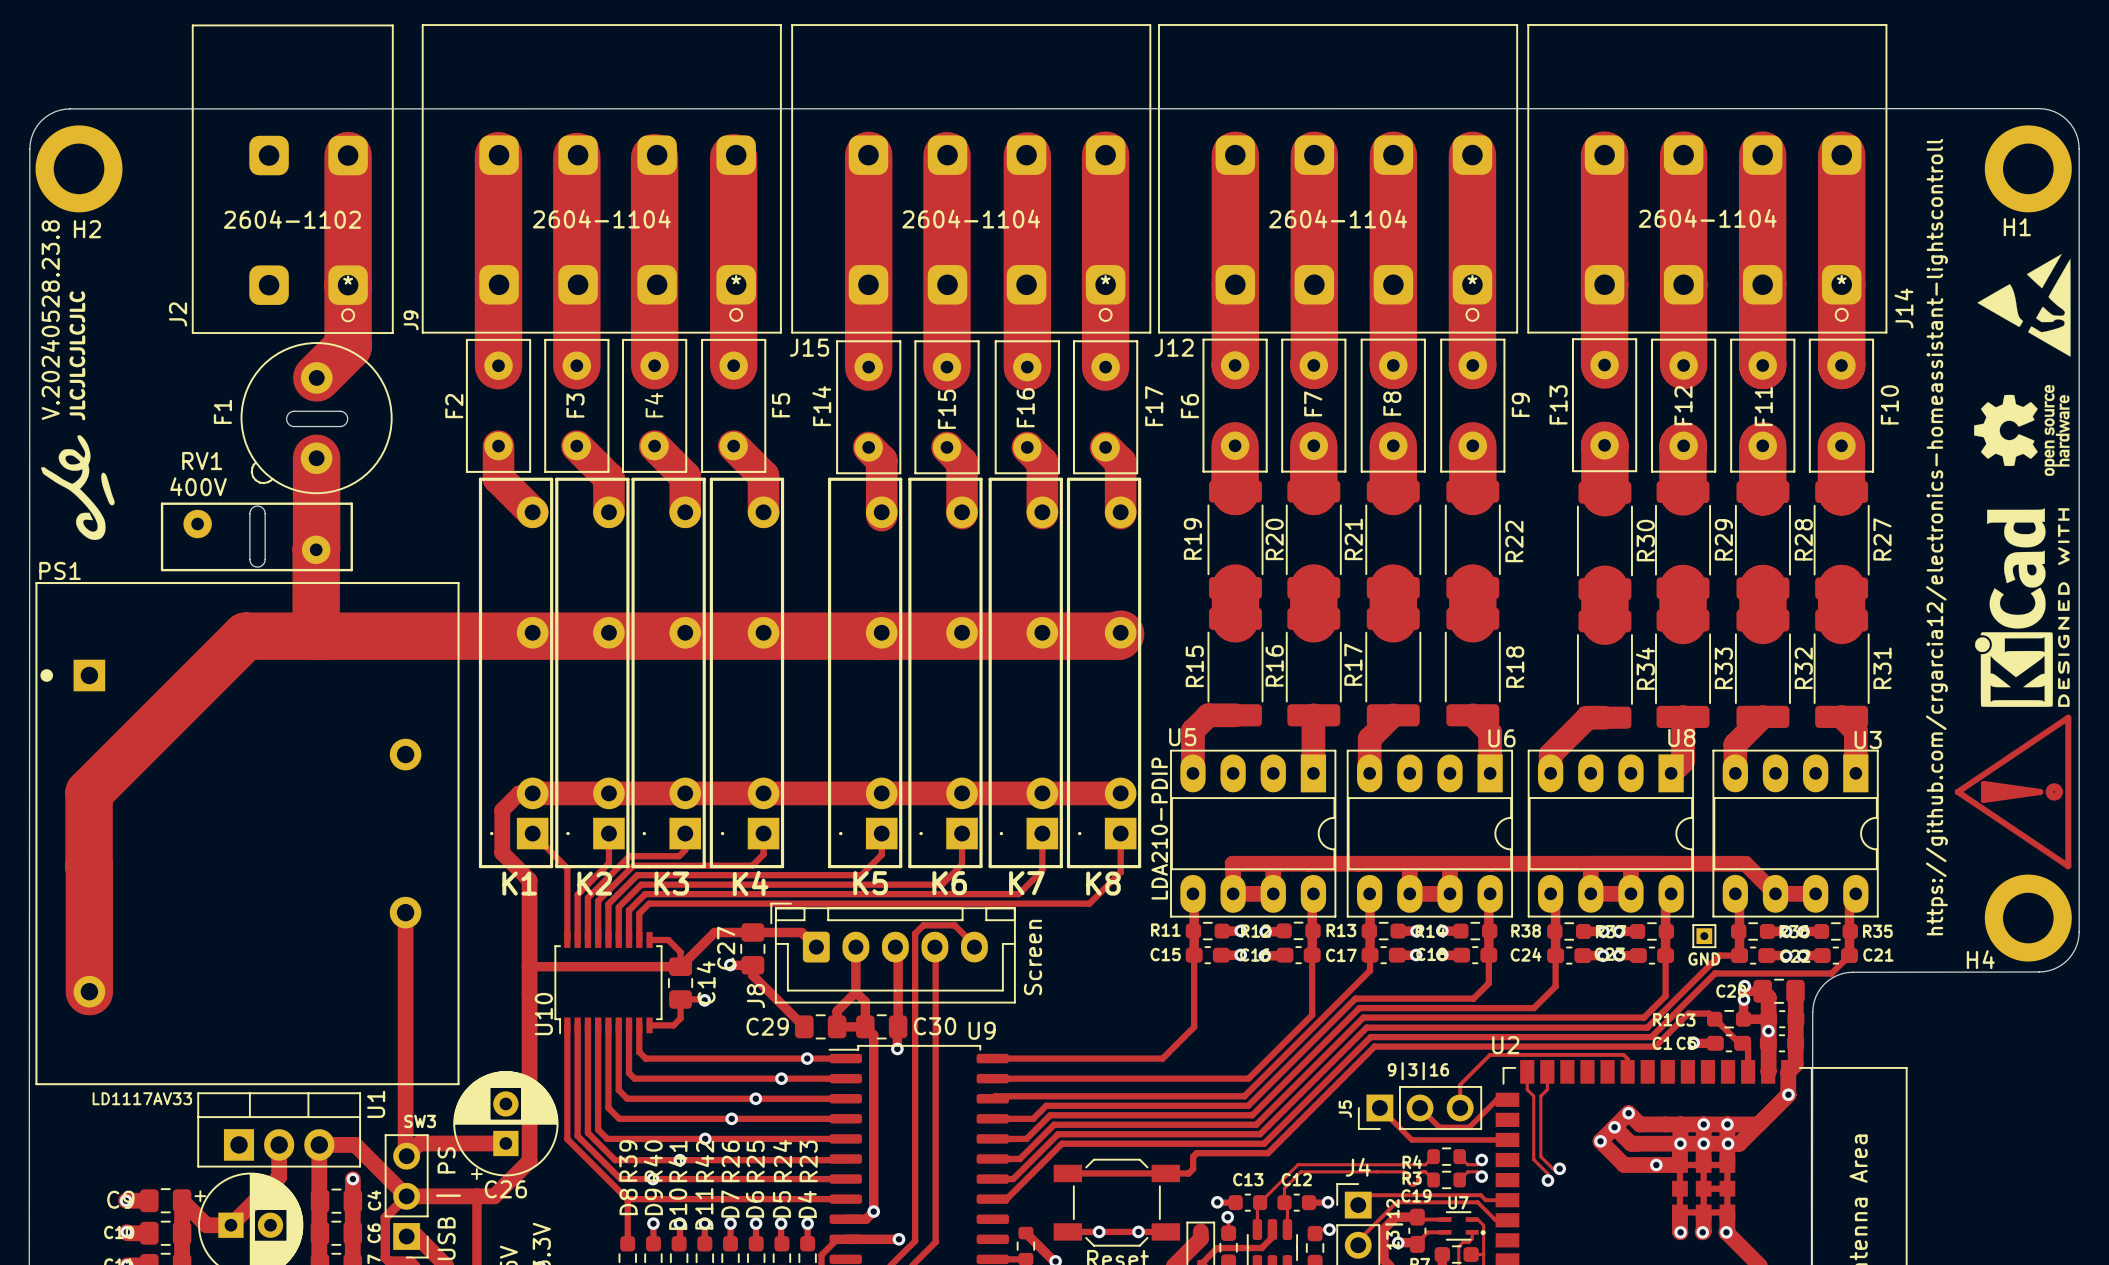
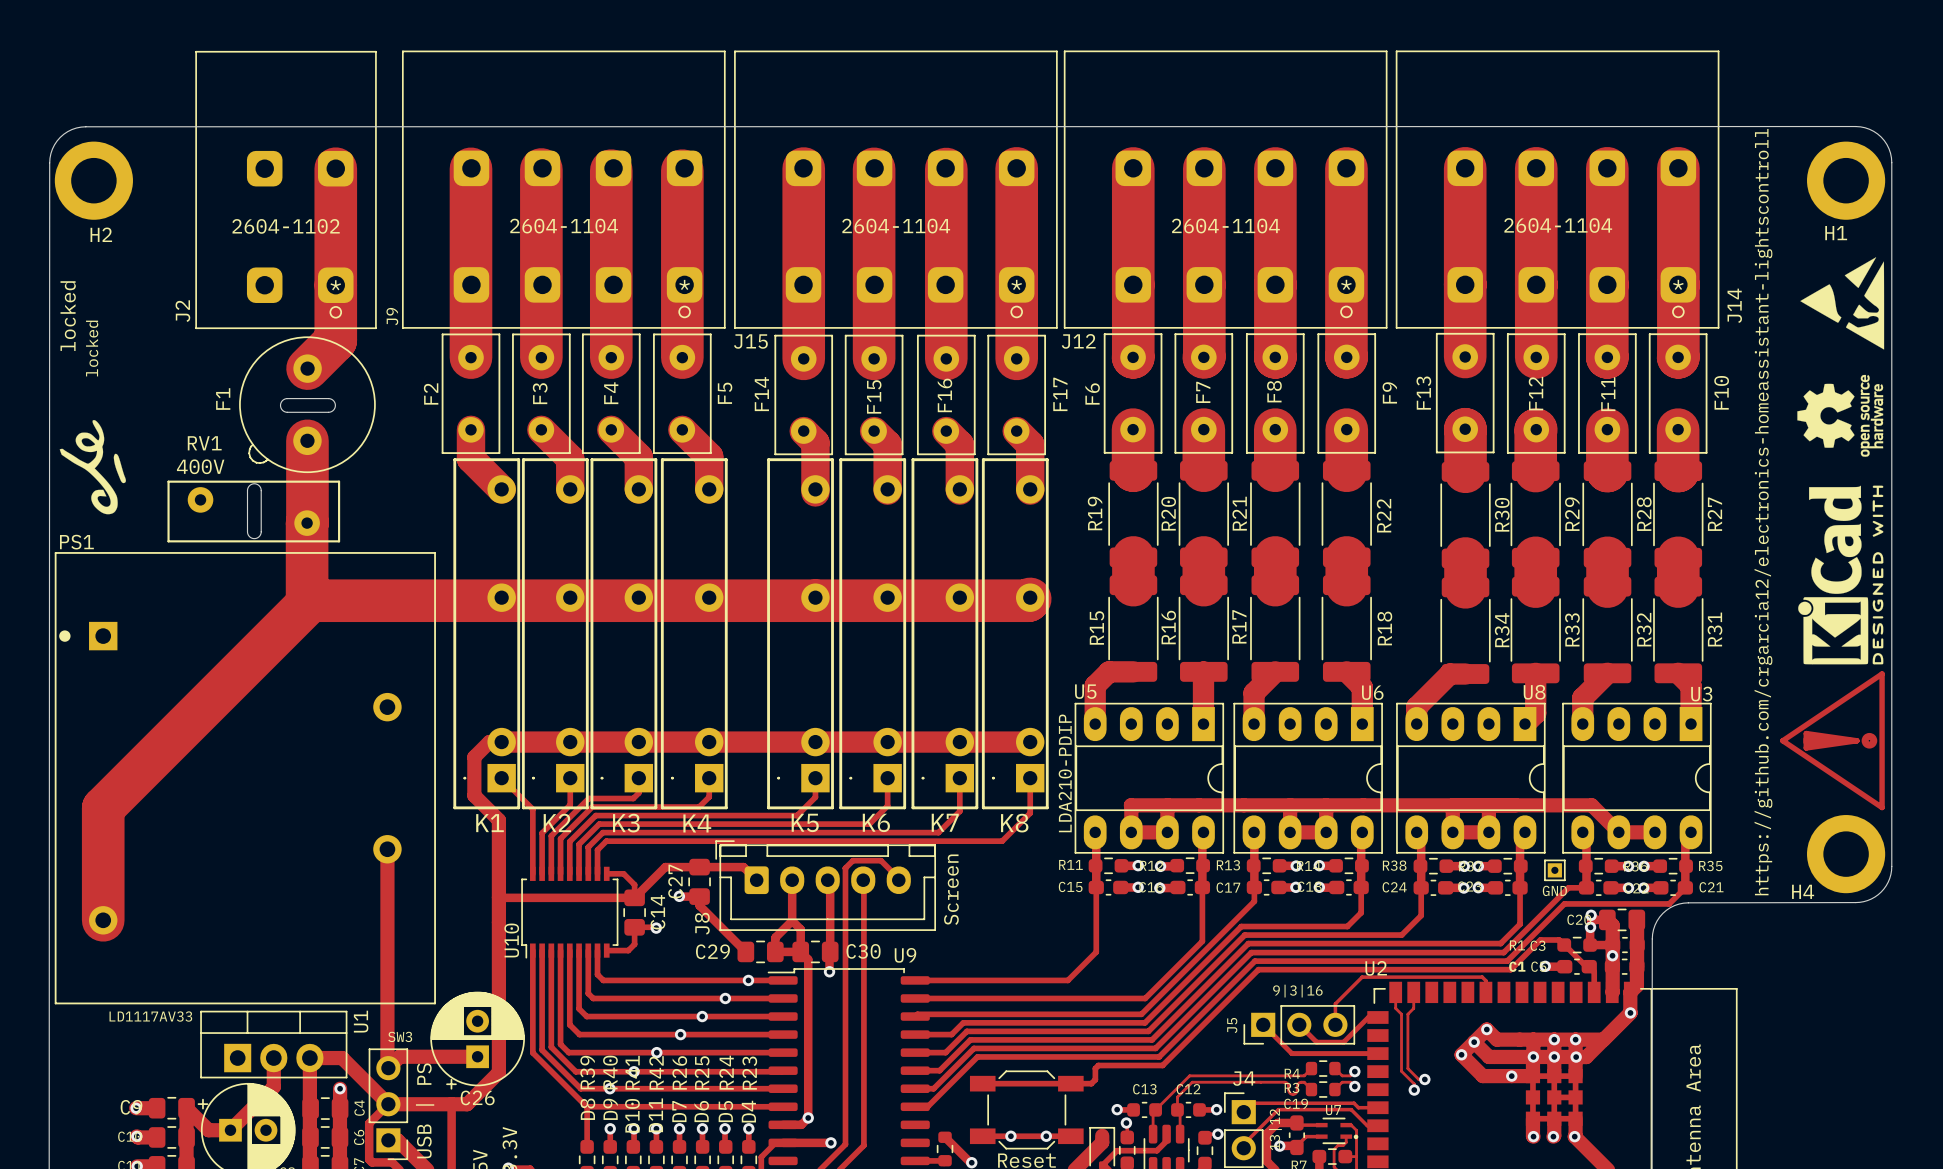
text: V.20240528.23.8 (50, 320) -> locked (68, 316)
text: JLCJLCJLCJLC (77, 355) -> locked (92, 348)
track: (316, 632) (320, 636) (245, 636) (89, 792) (89, 866) -> (310, 600) (103, 808)

